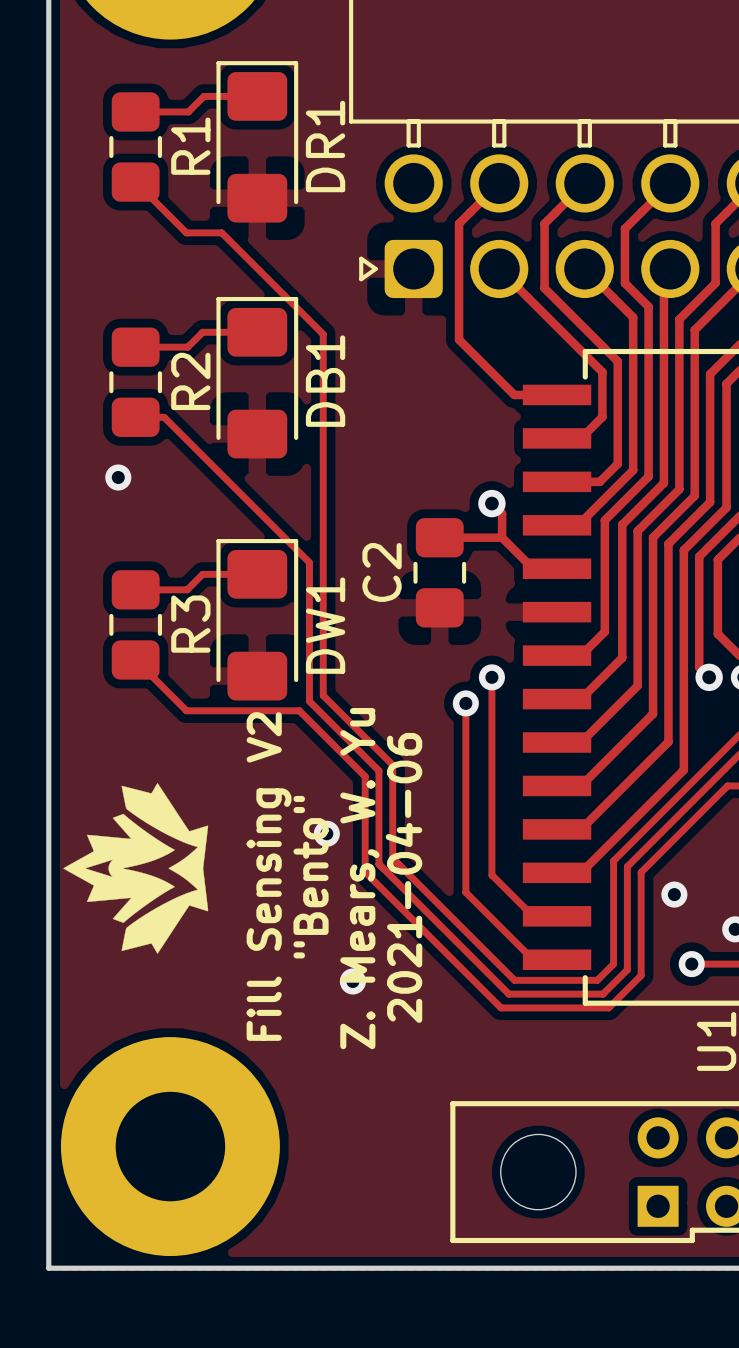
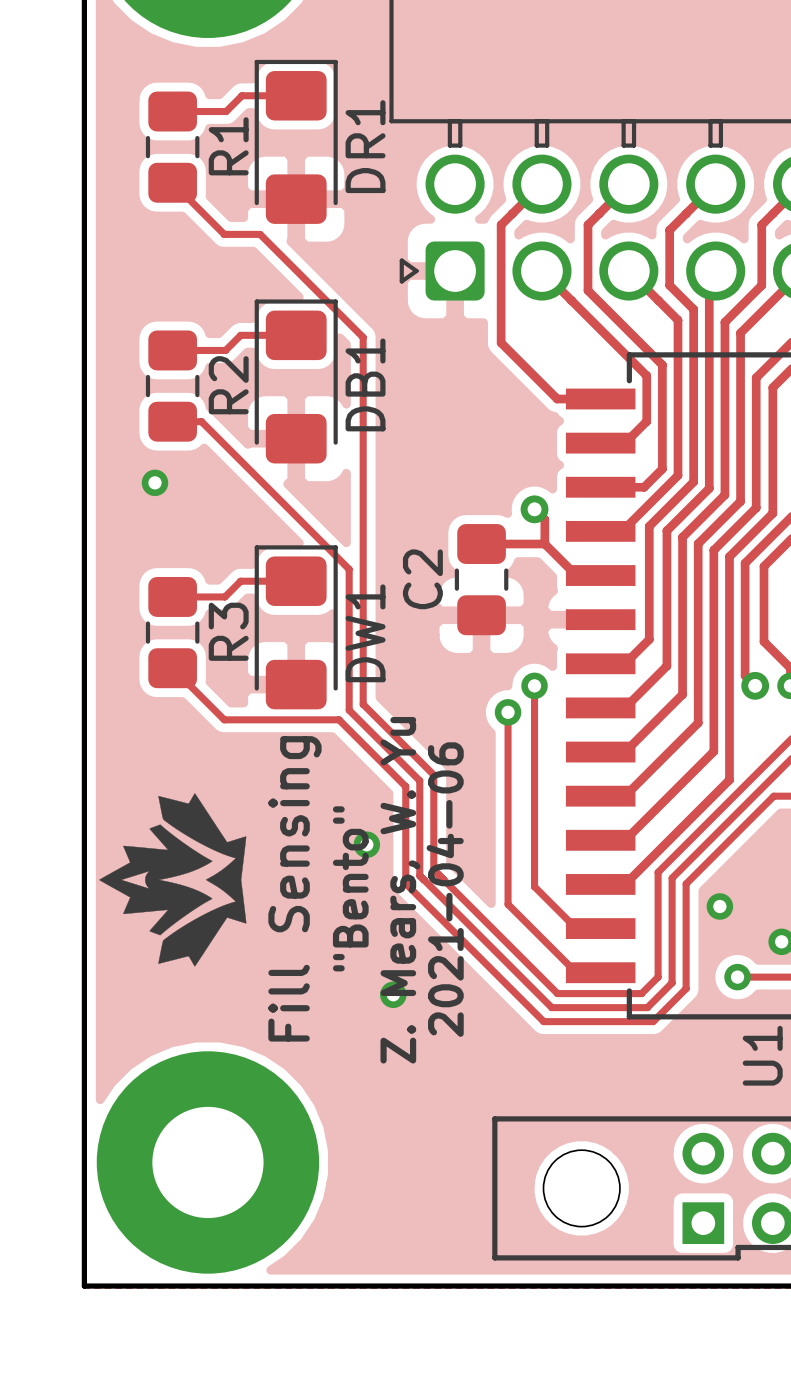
text: Fill Sensing V2 (269, 876) -> Fill Sensing (294, 888)

